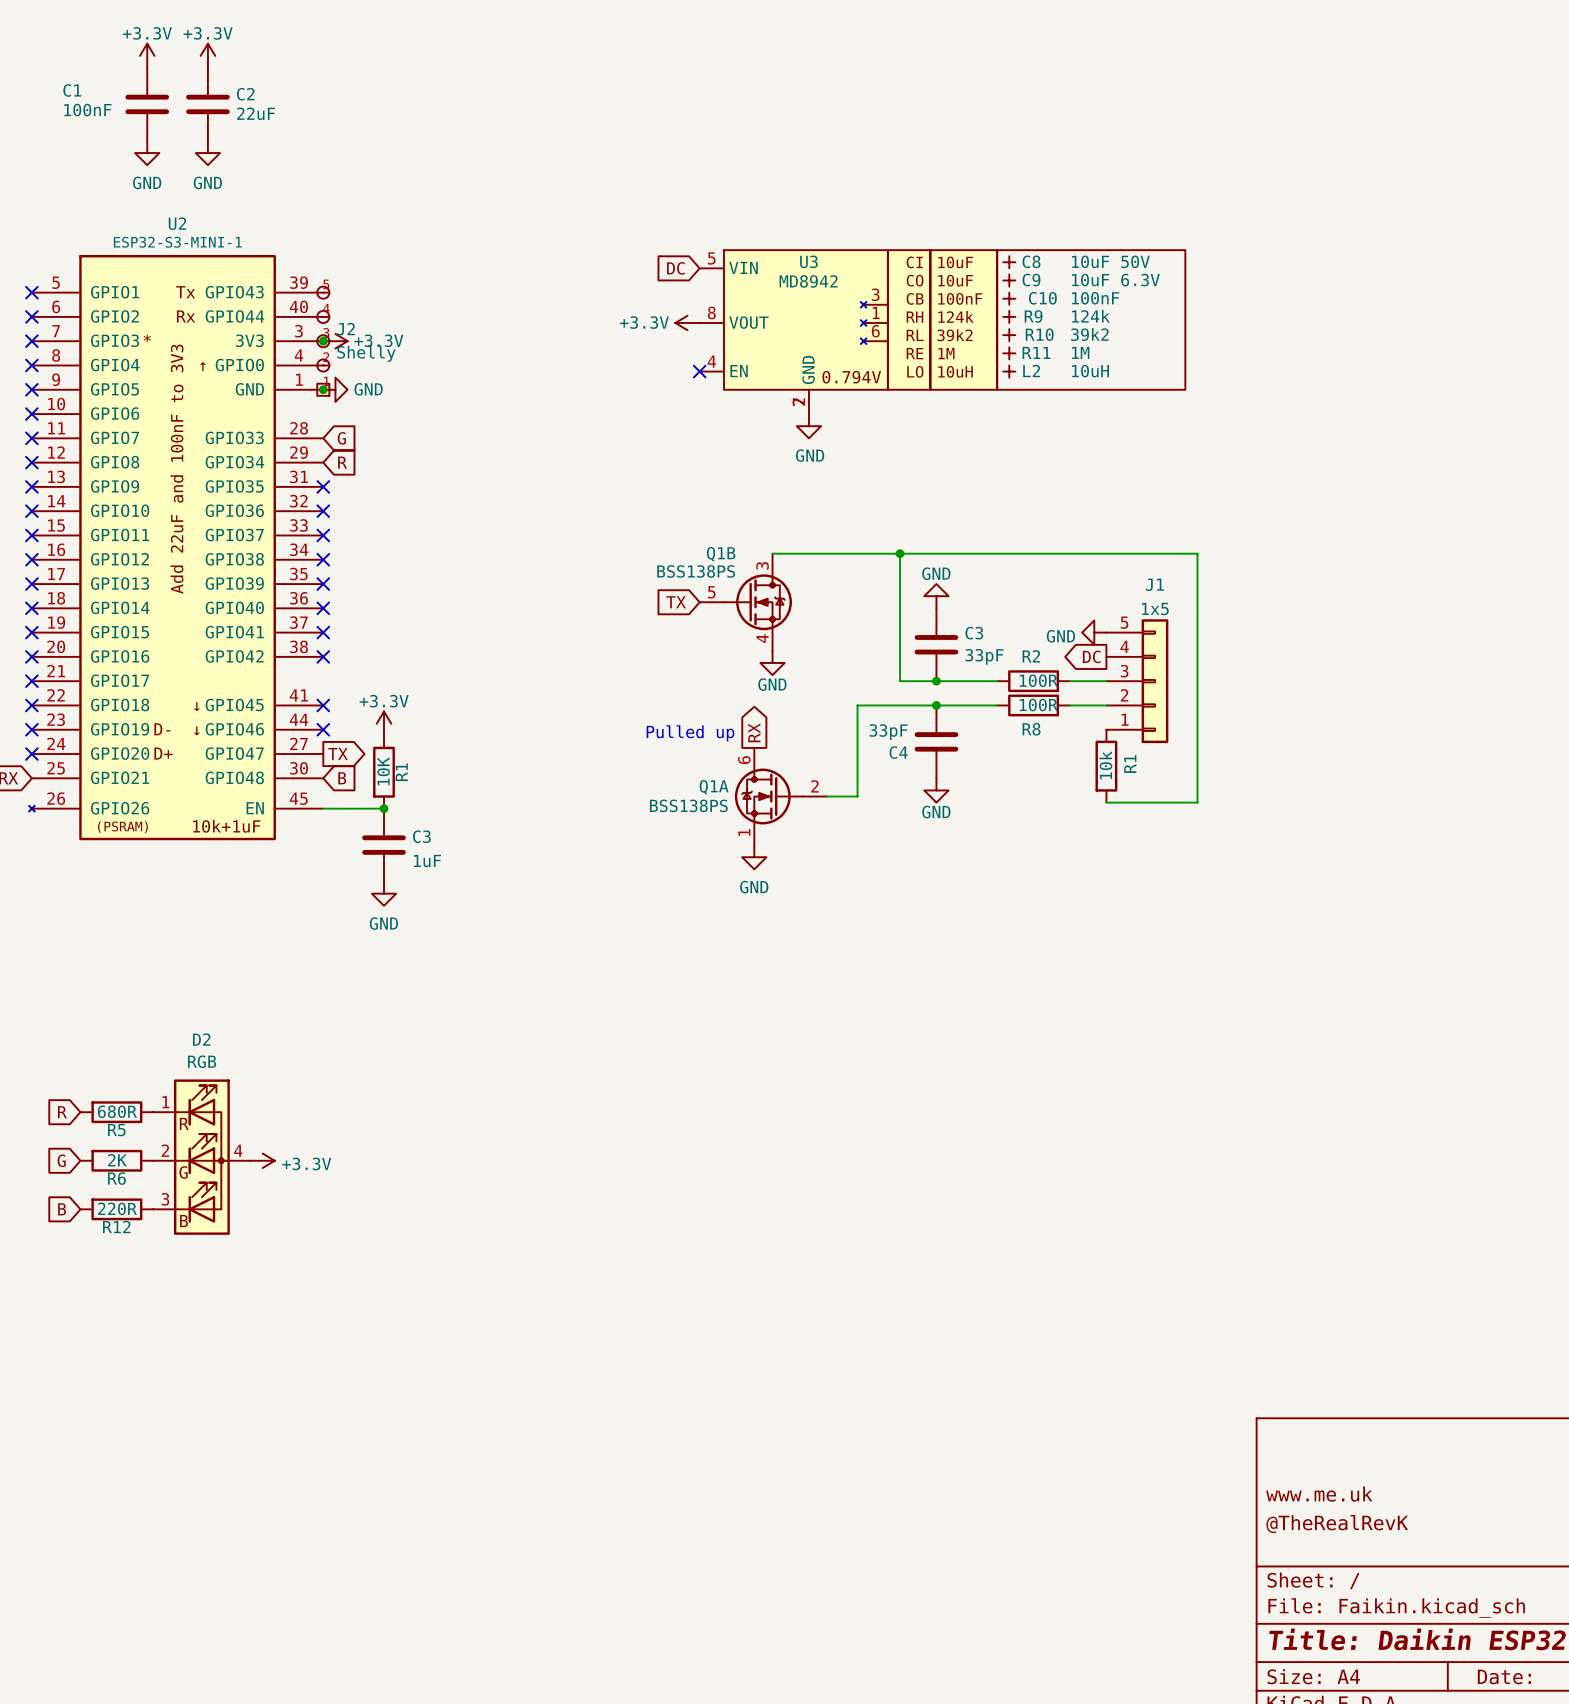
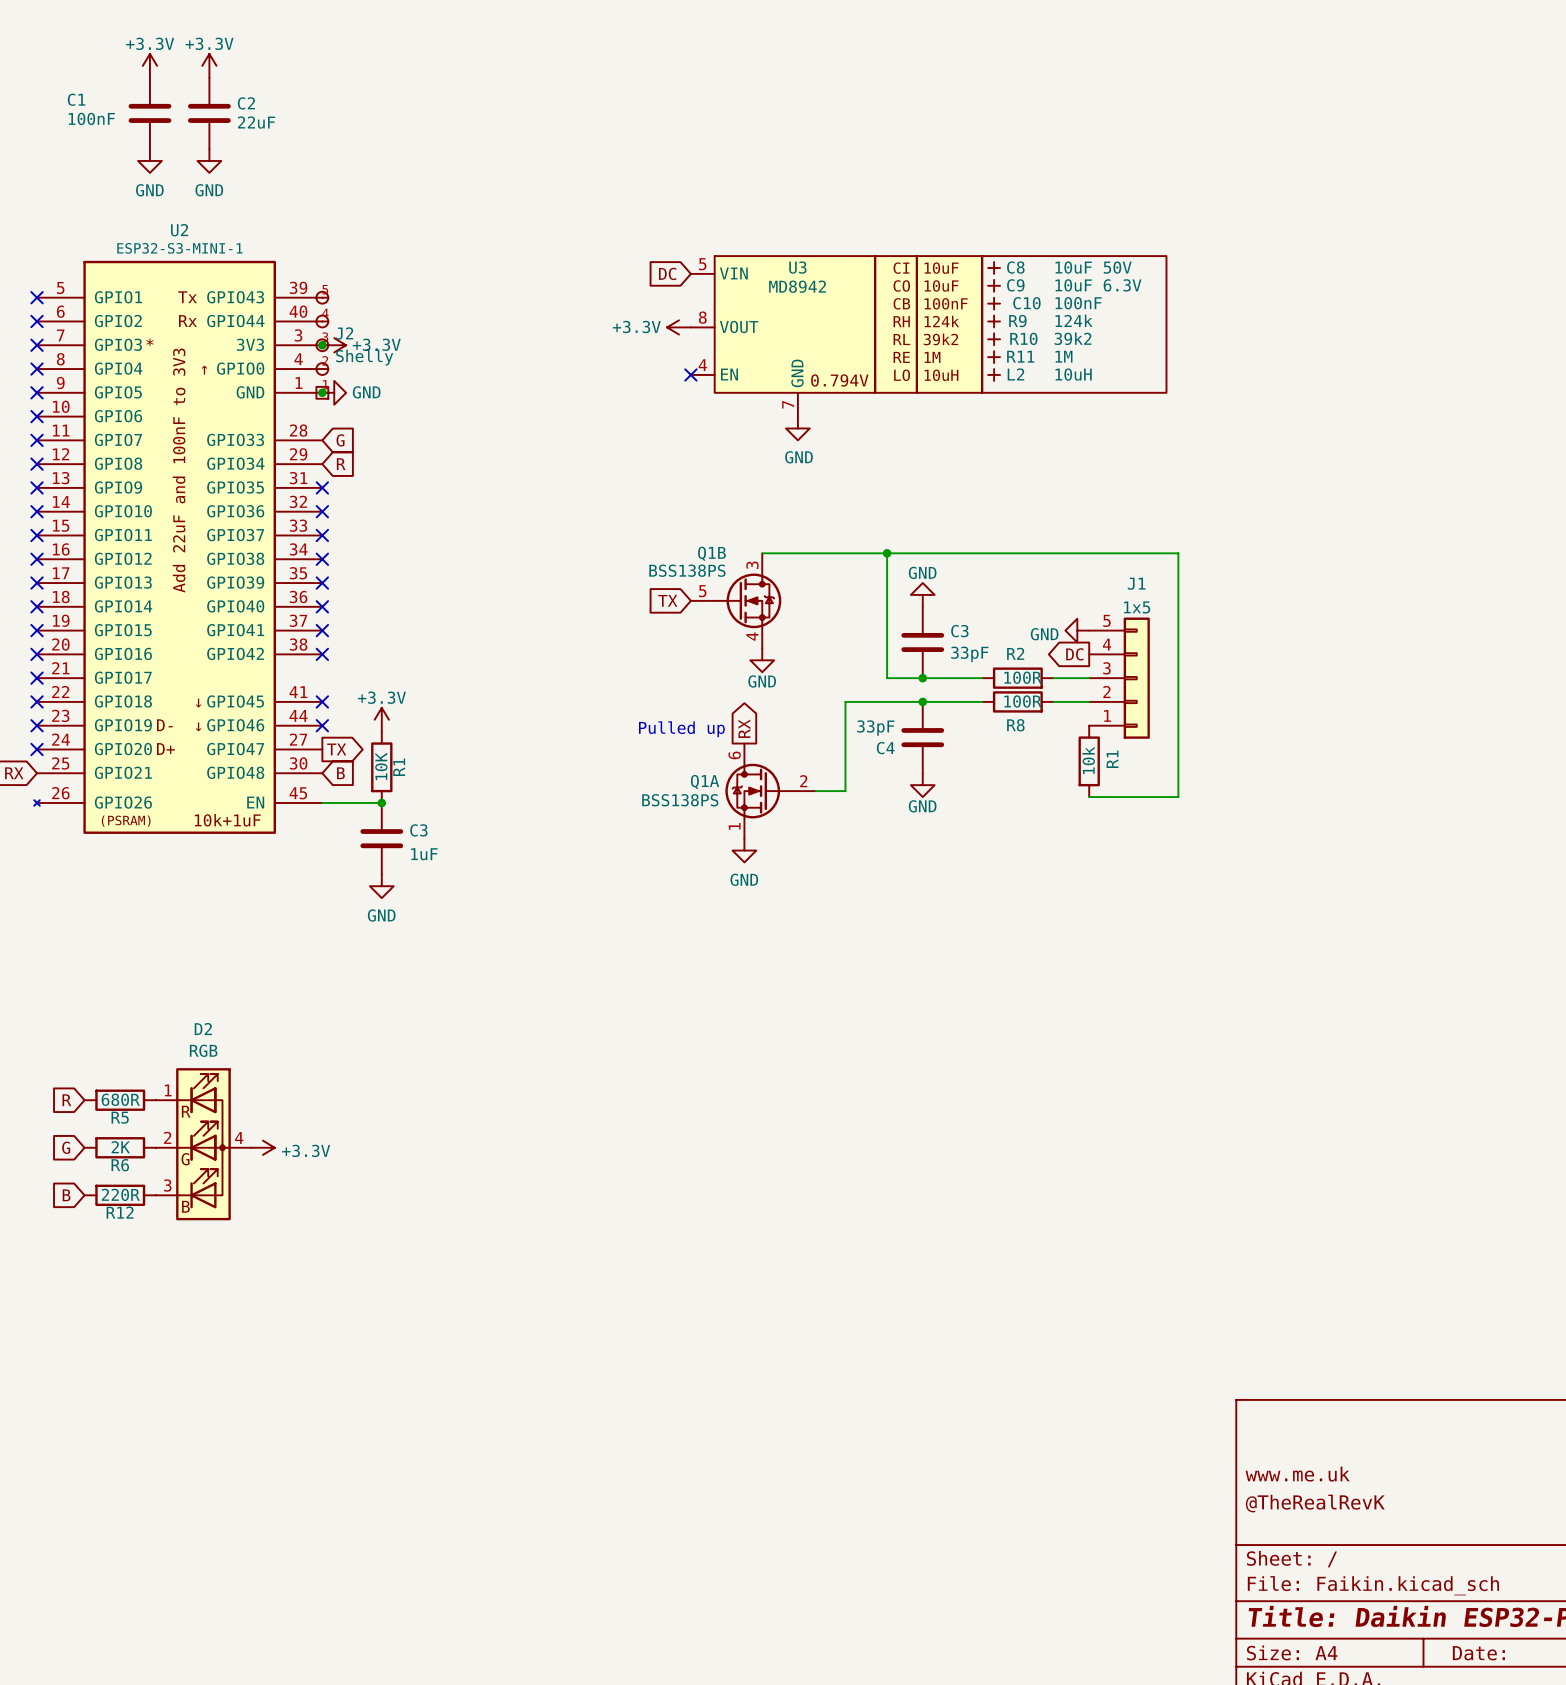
U3 symbol: [699, 250, 1186, 415] -> [690, 256, 1167, 417]

